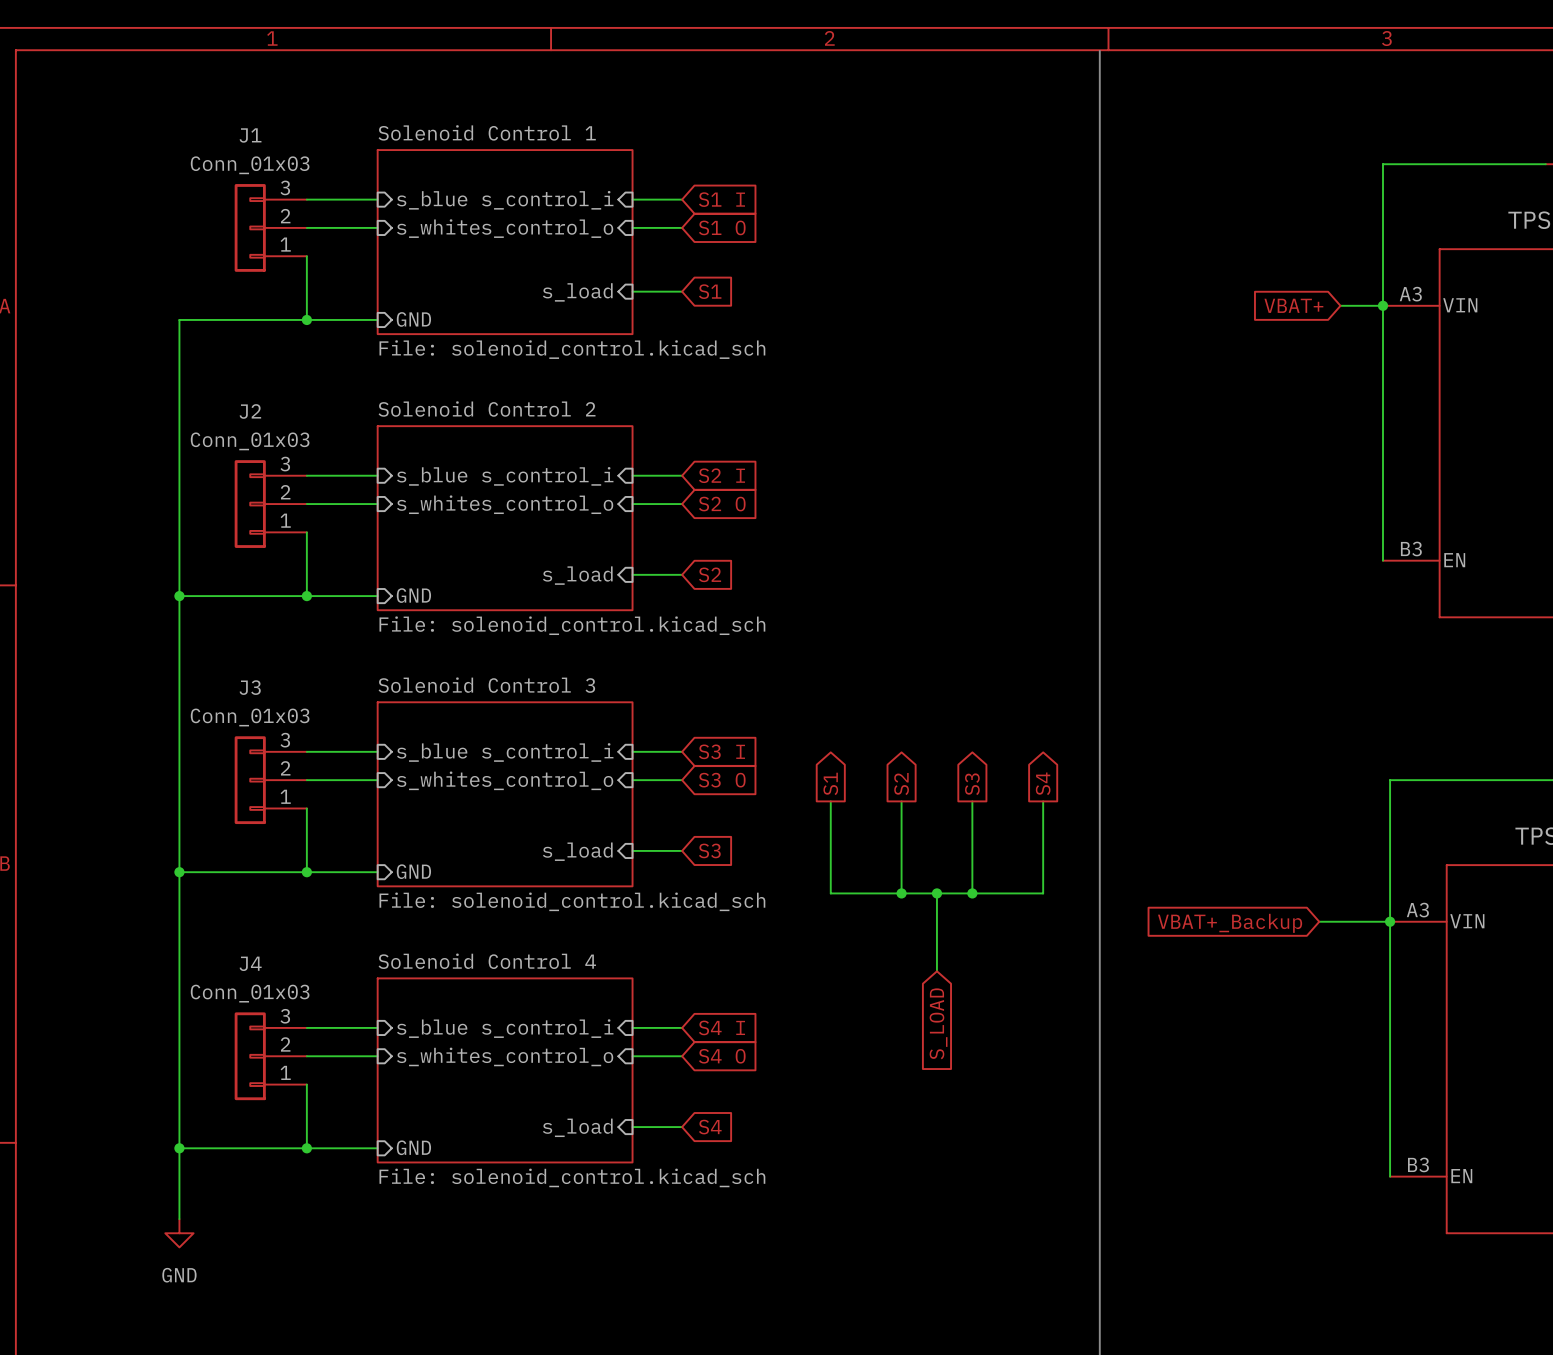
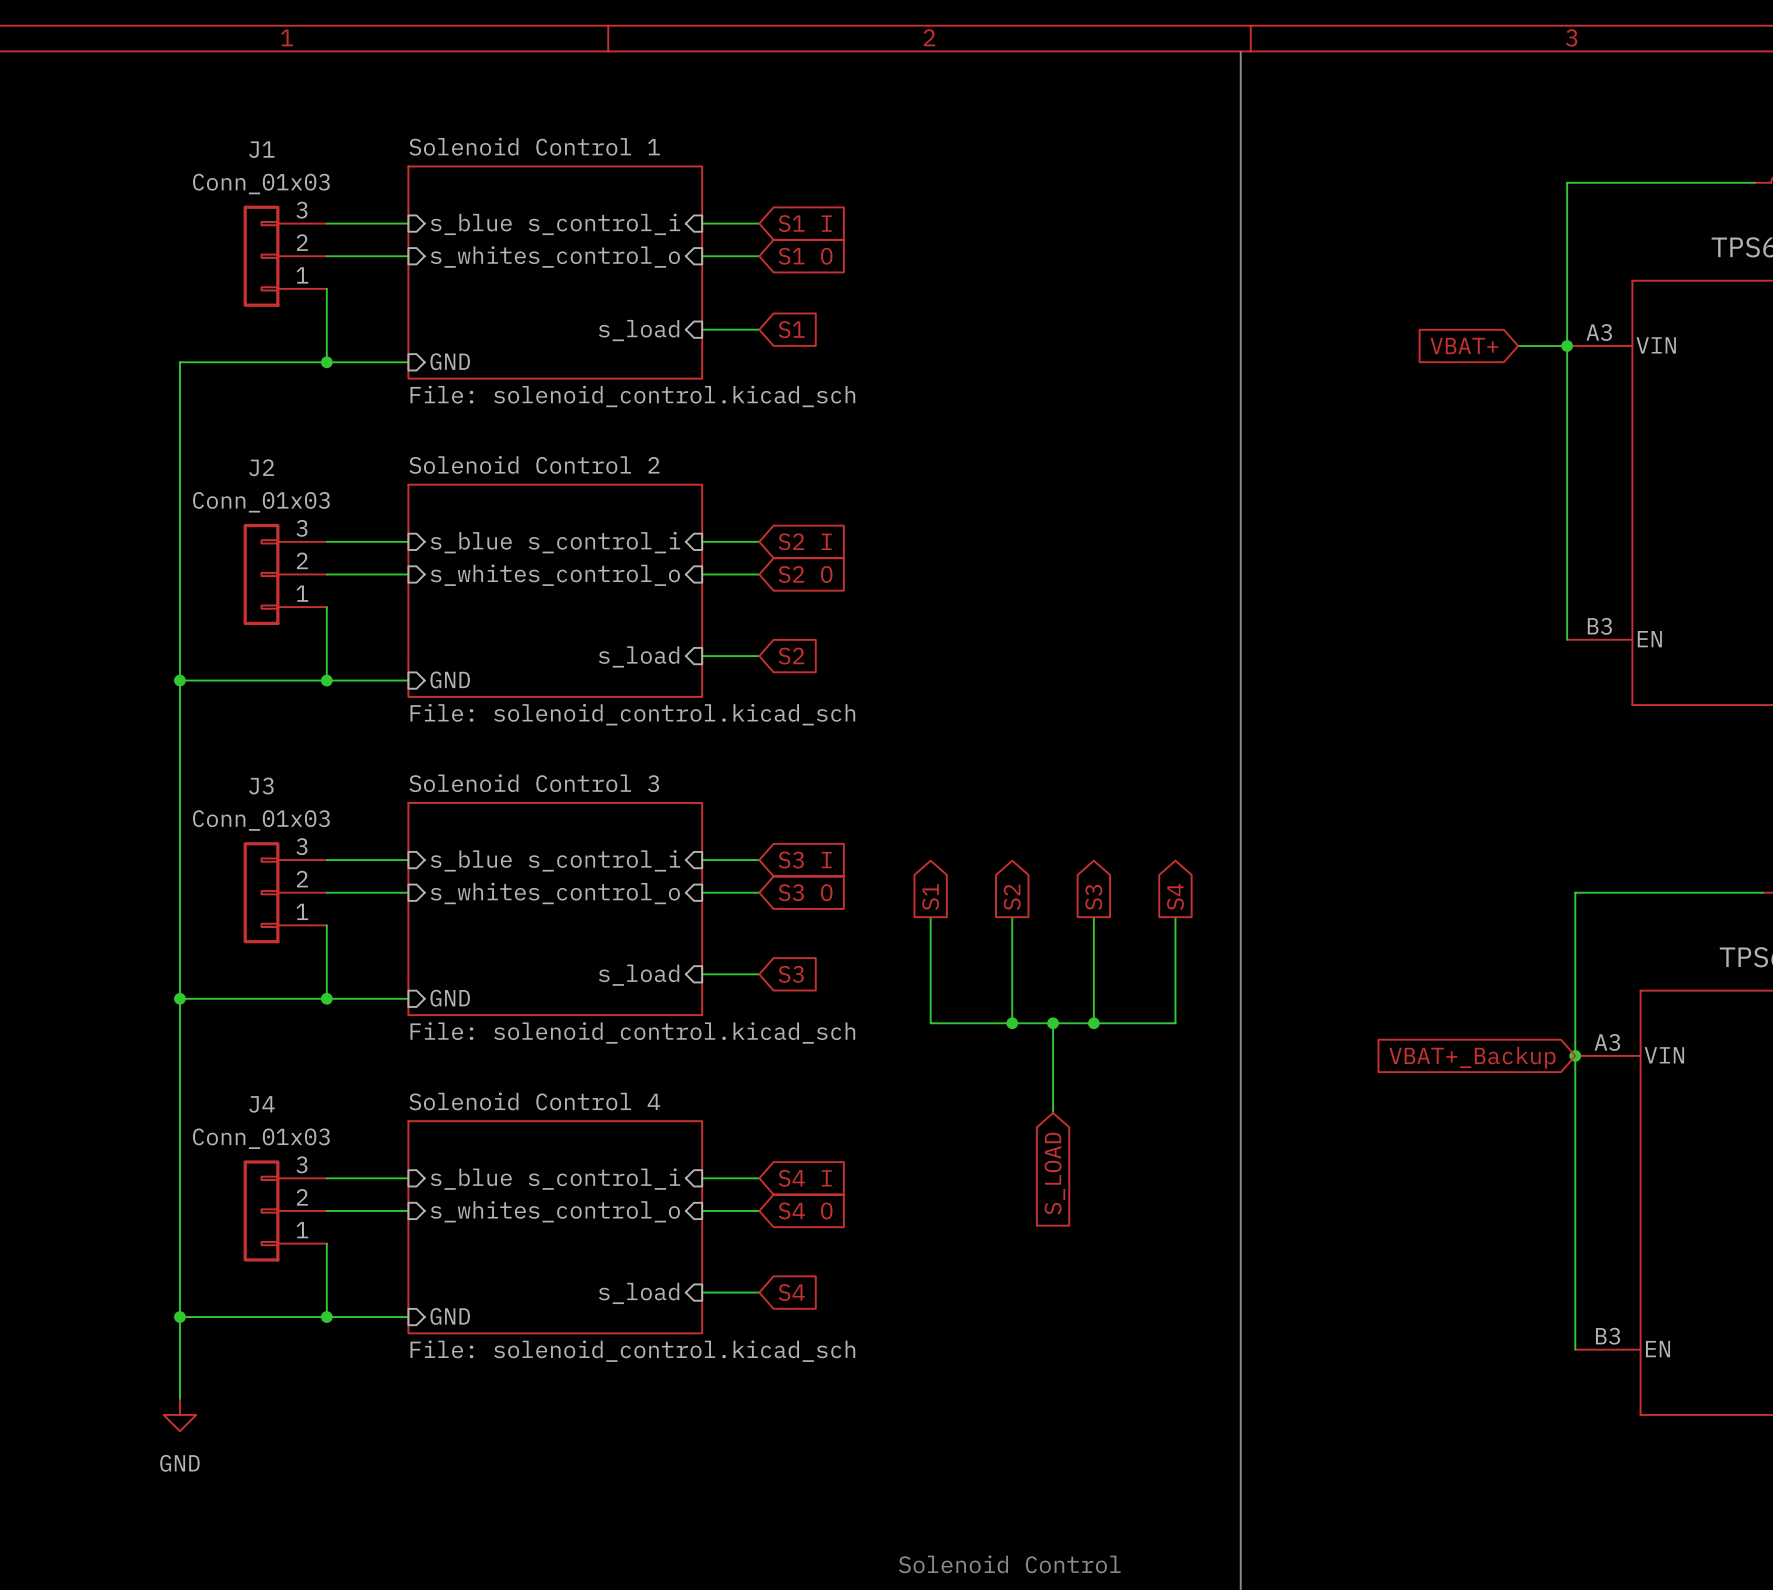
wire: (1319, 921) (1390, 921) -> none
global label position: VBAT+_Backup (1230, 923) -> VBAT+_Backup (1472, 1057)

